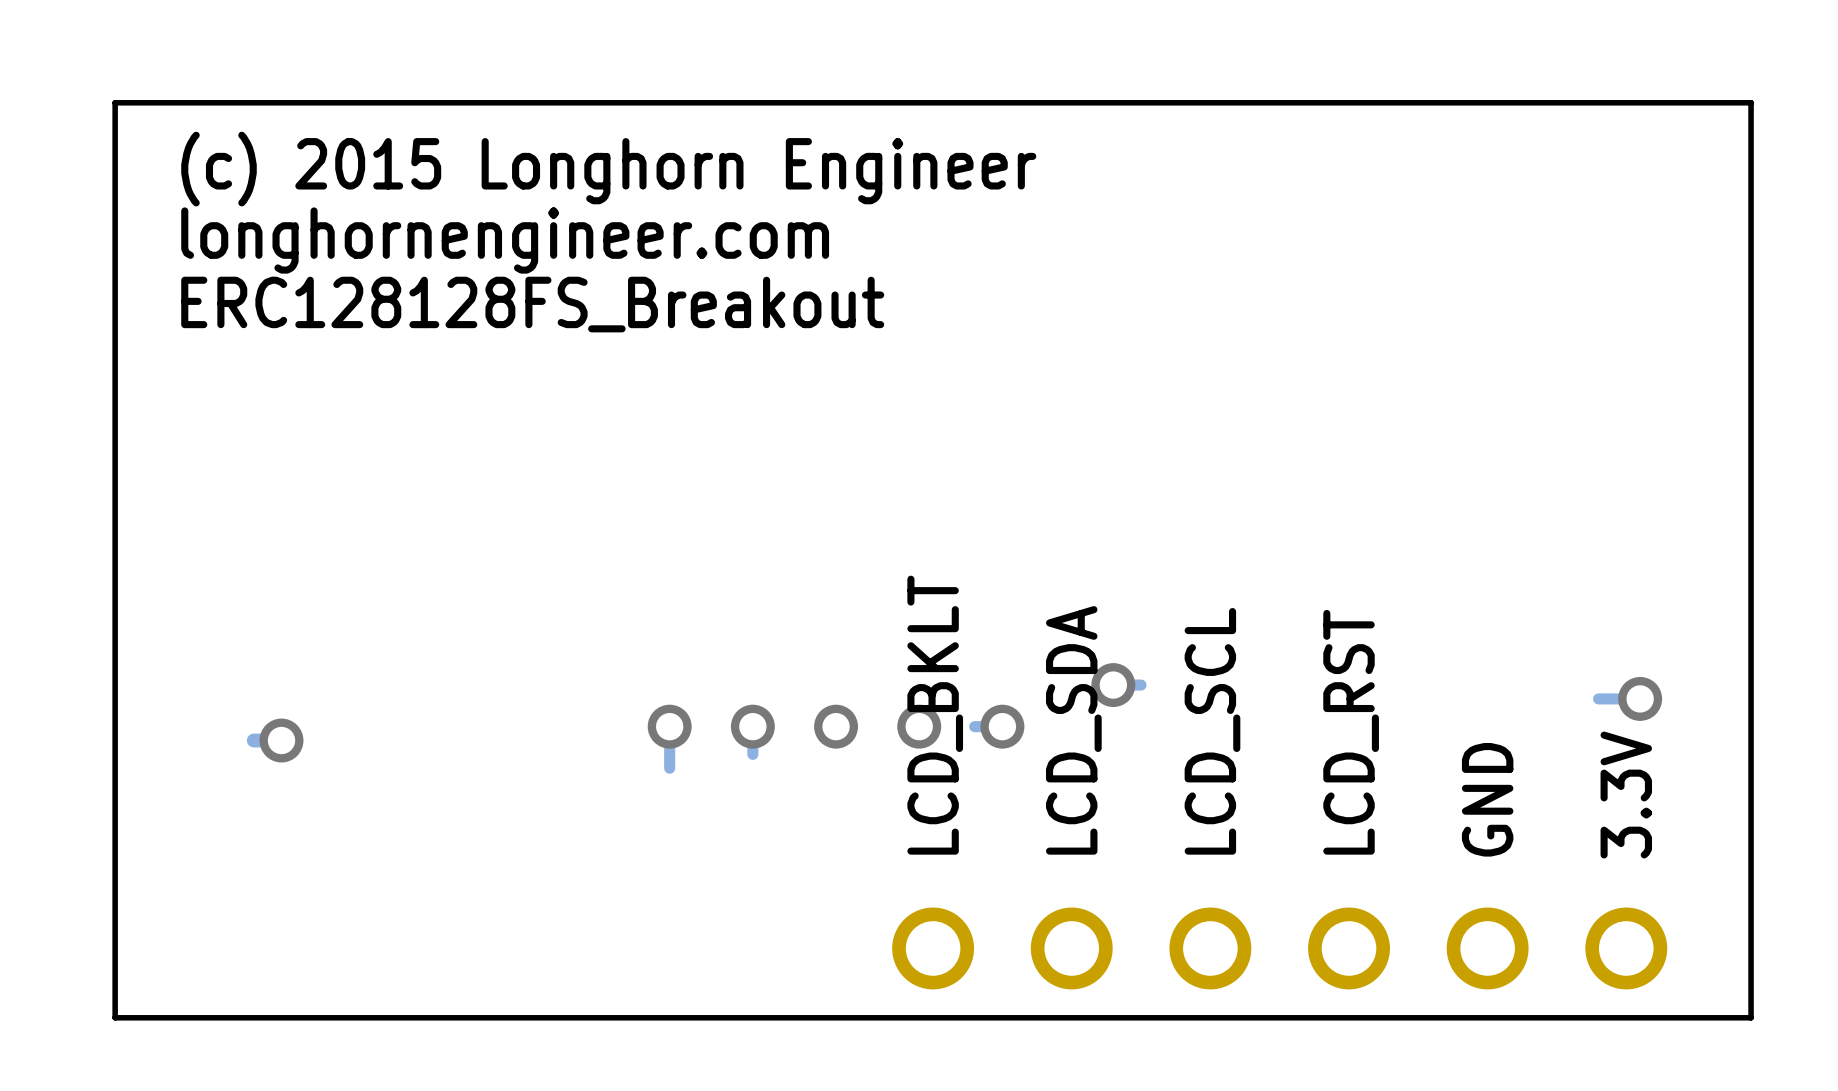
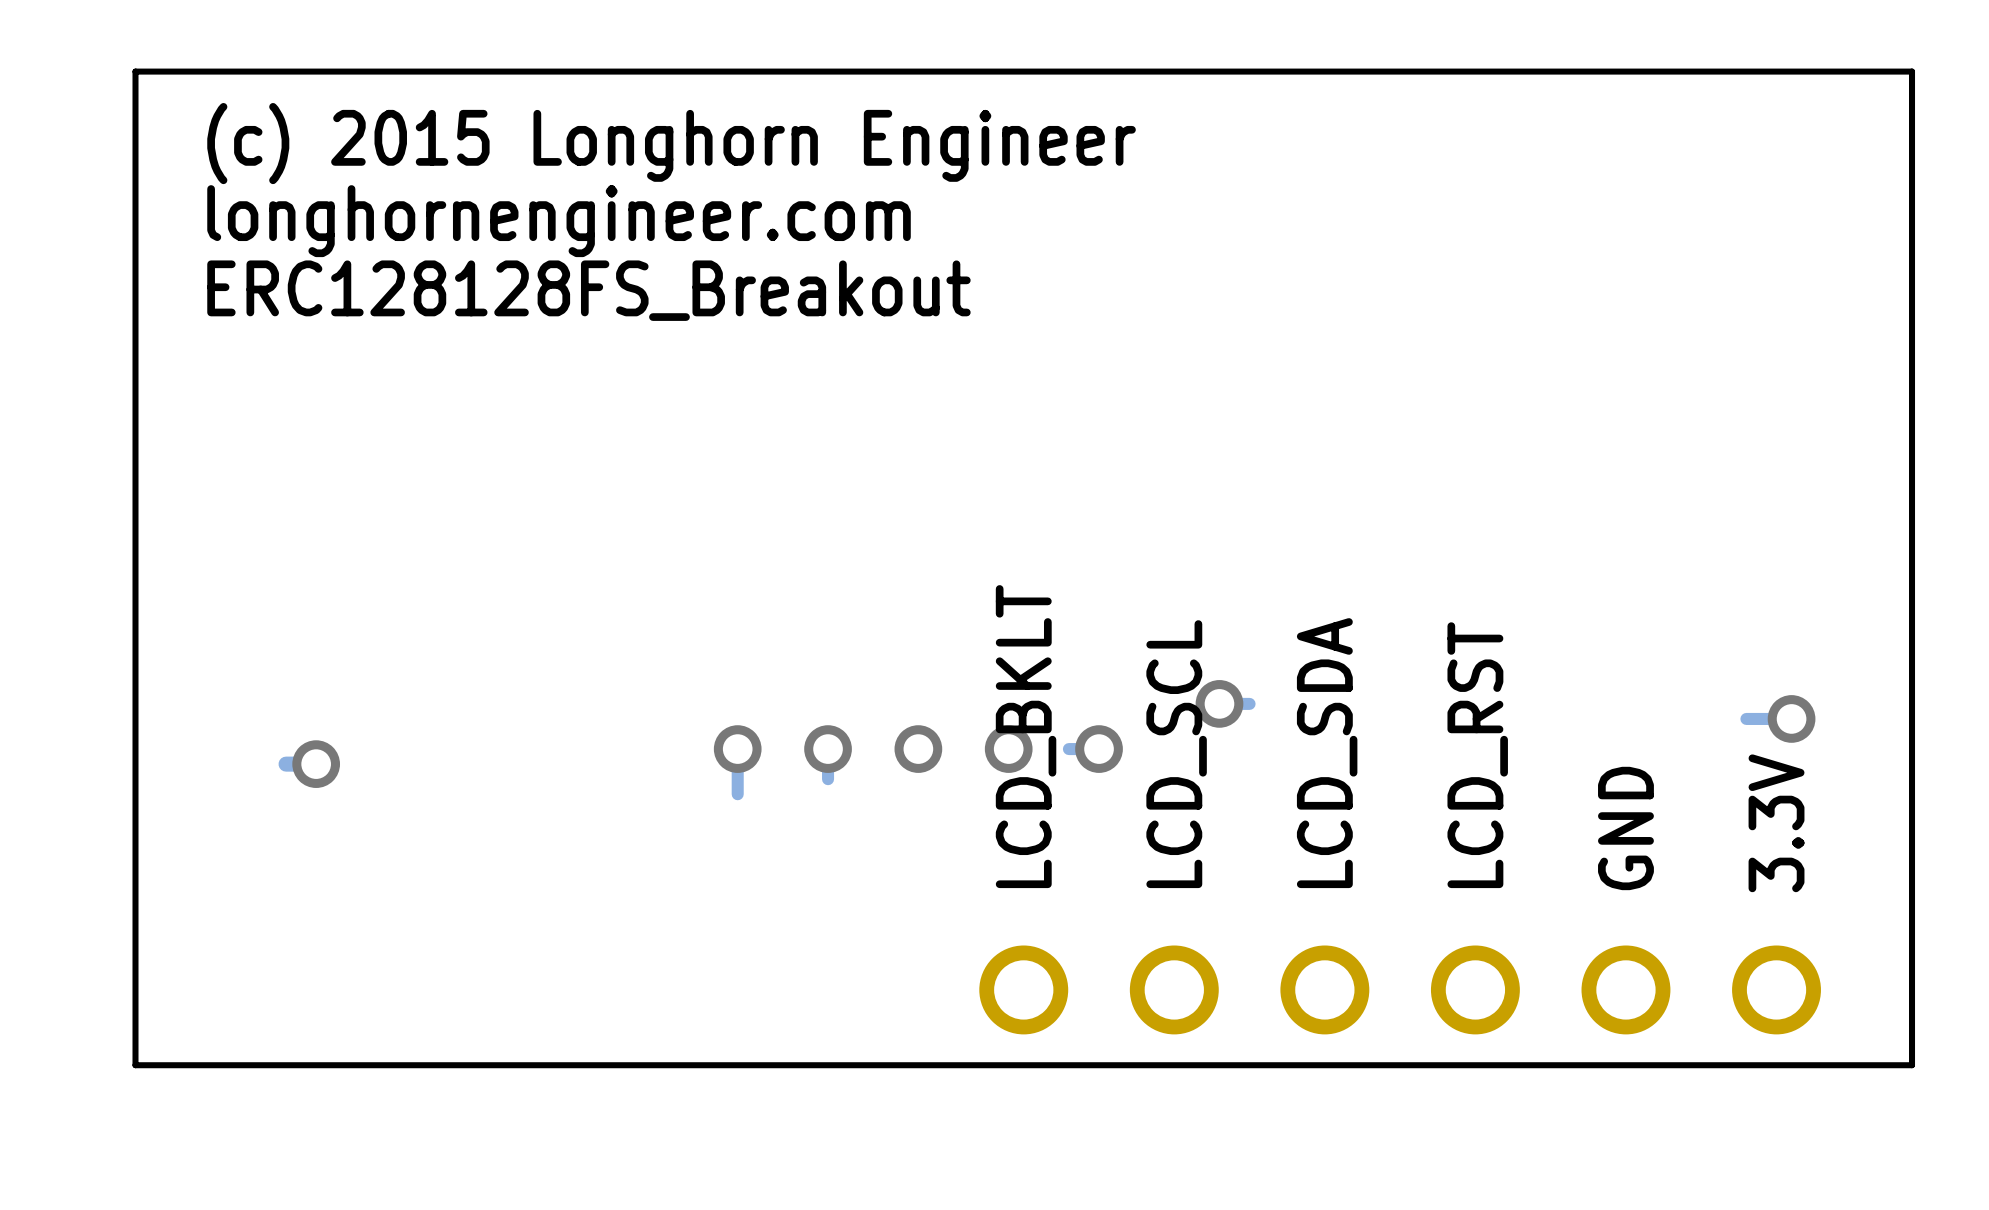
part text: LCD_SDA (1073, 730) -> LCD_SCL (1176, 754)
part text: LCD_SCL (1212, 731) -> LCD_SDA (1327, 753)

